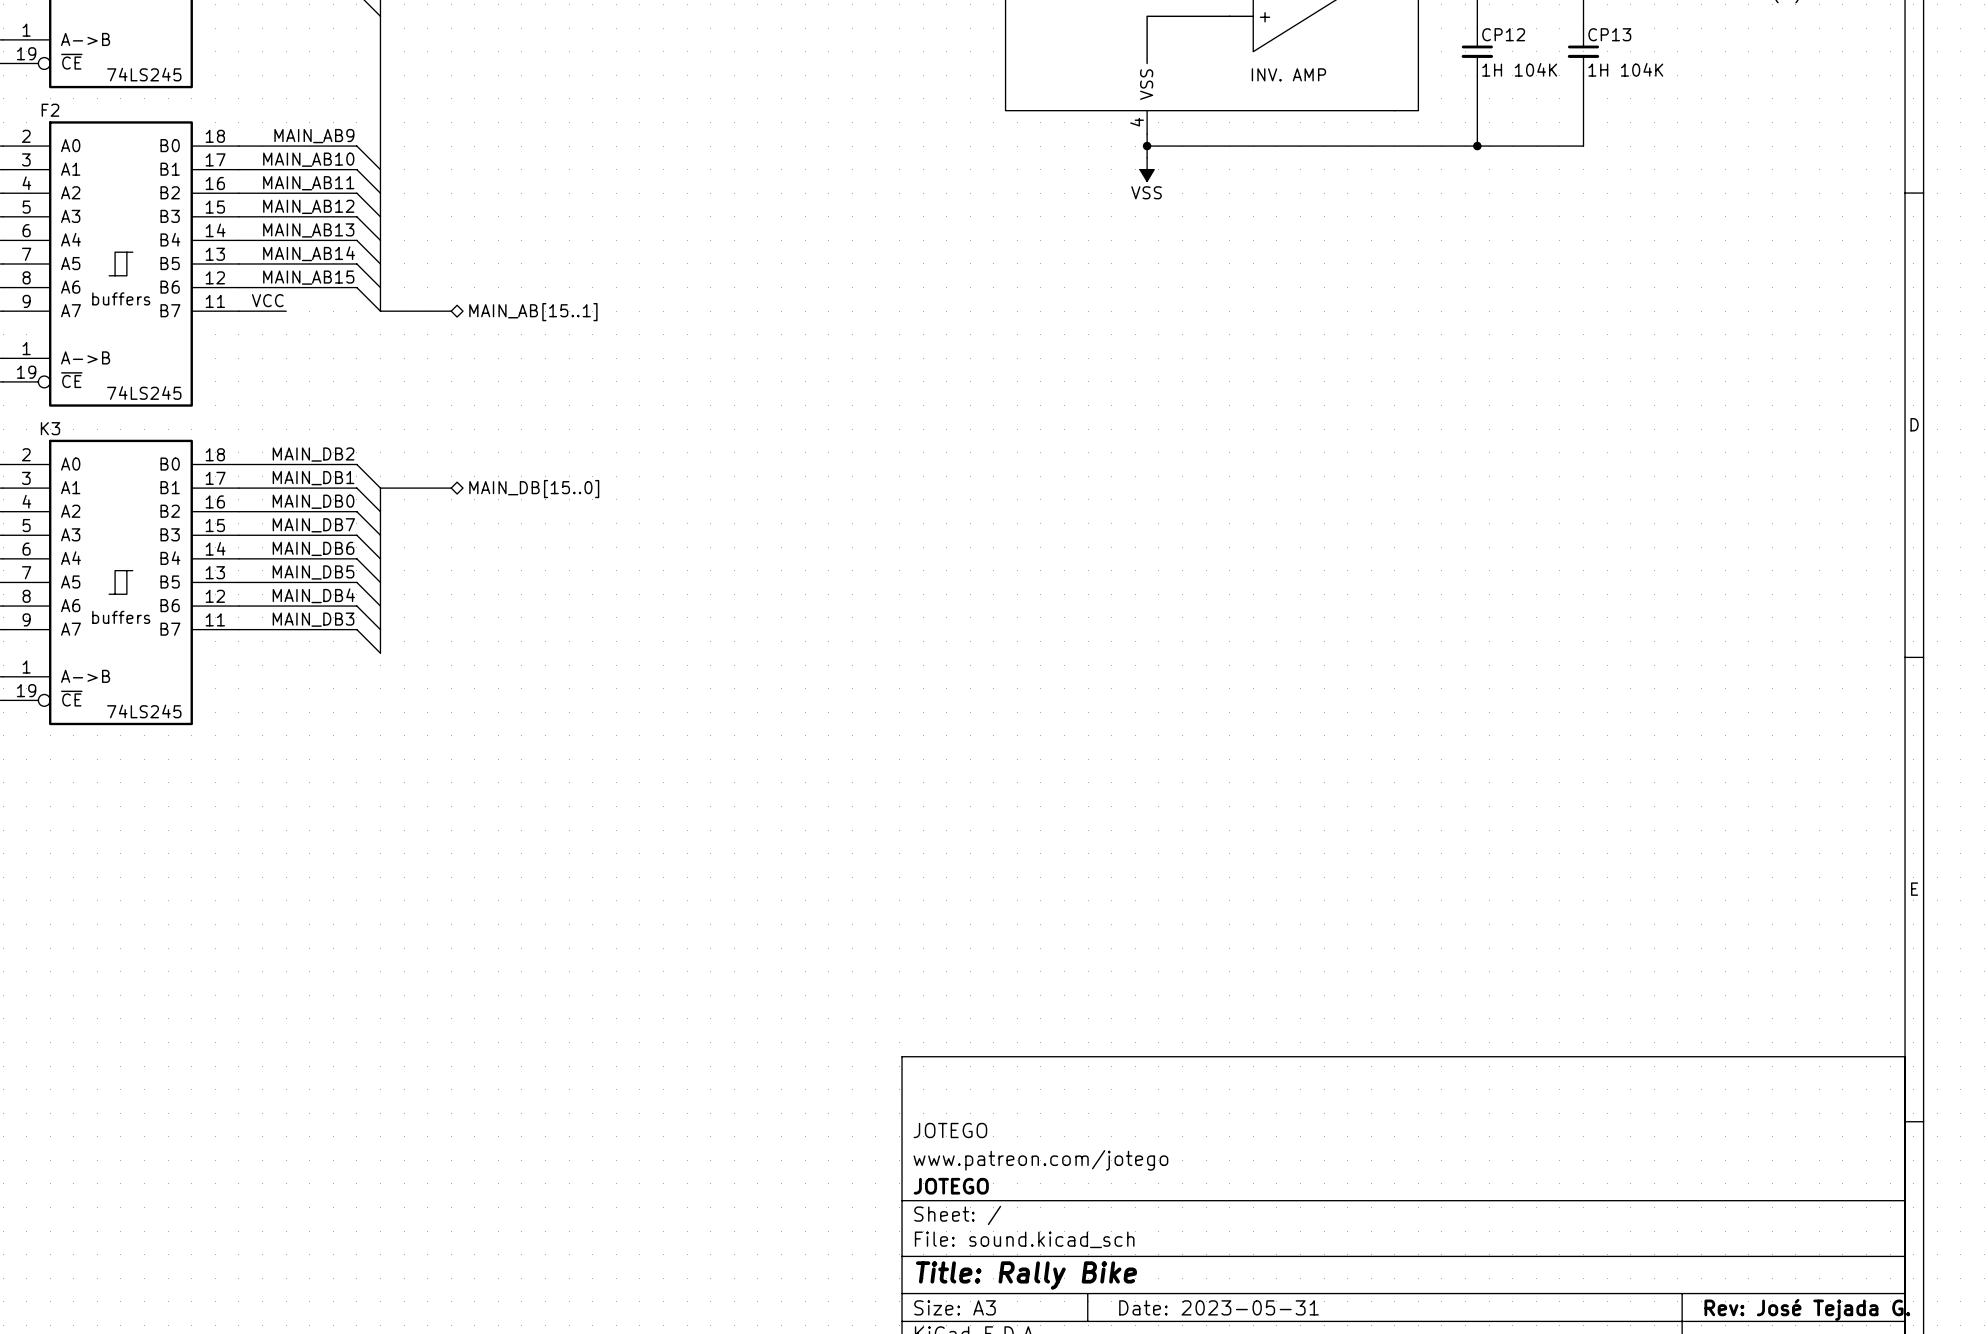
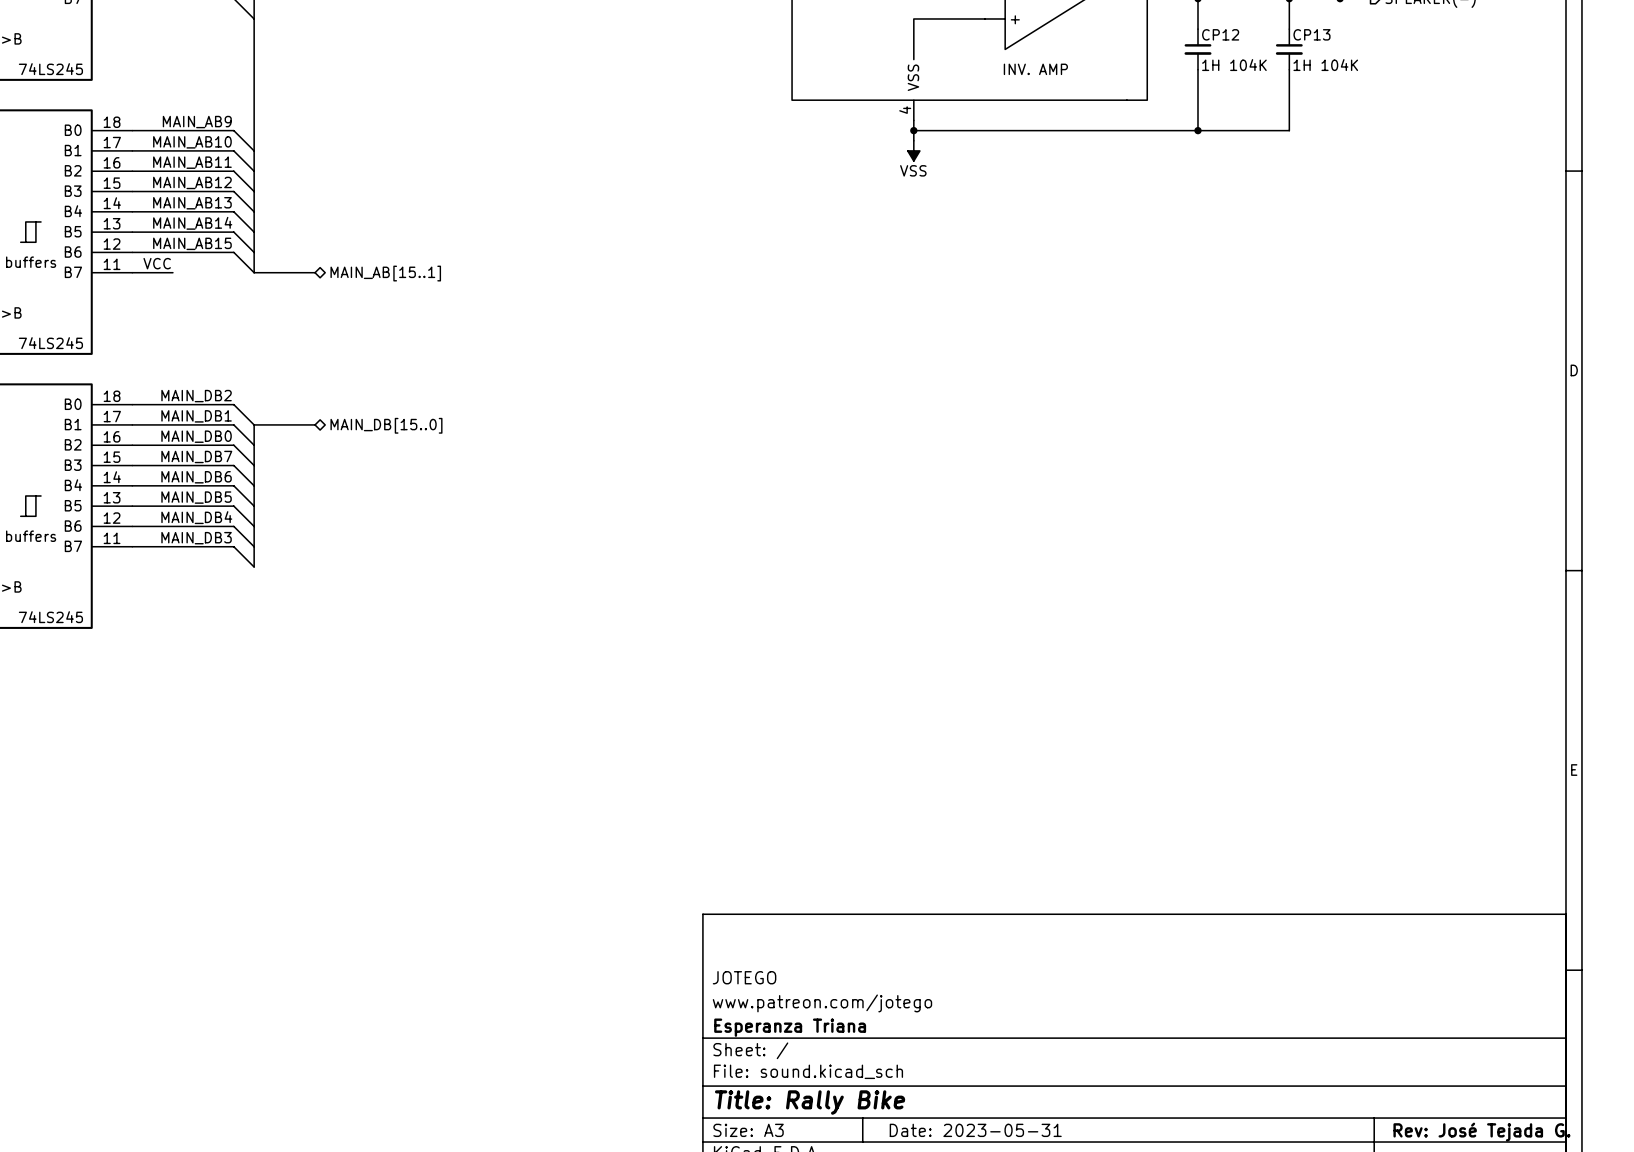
title block: JOTEGO (951, 1186) -> Esperanza Triana (790, 1027)

